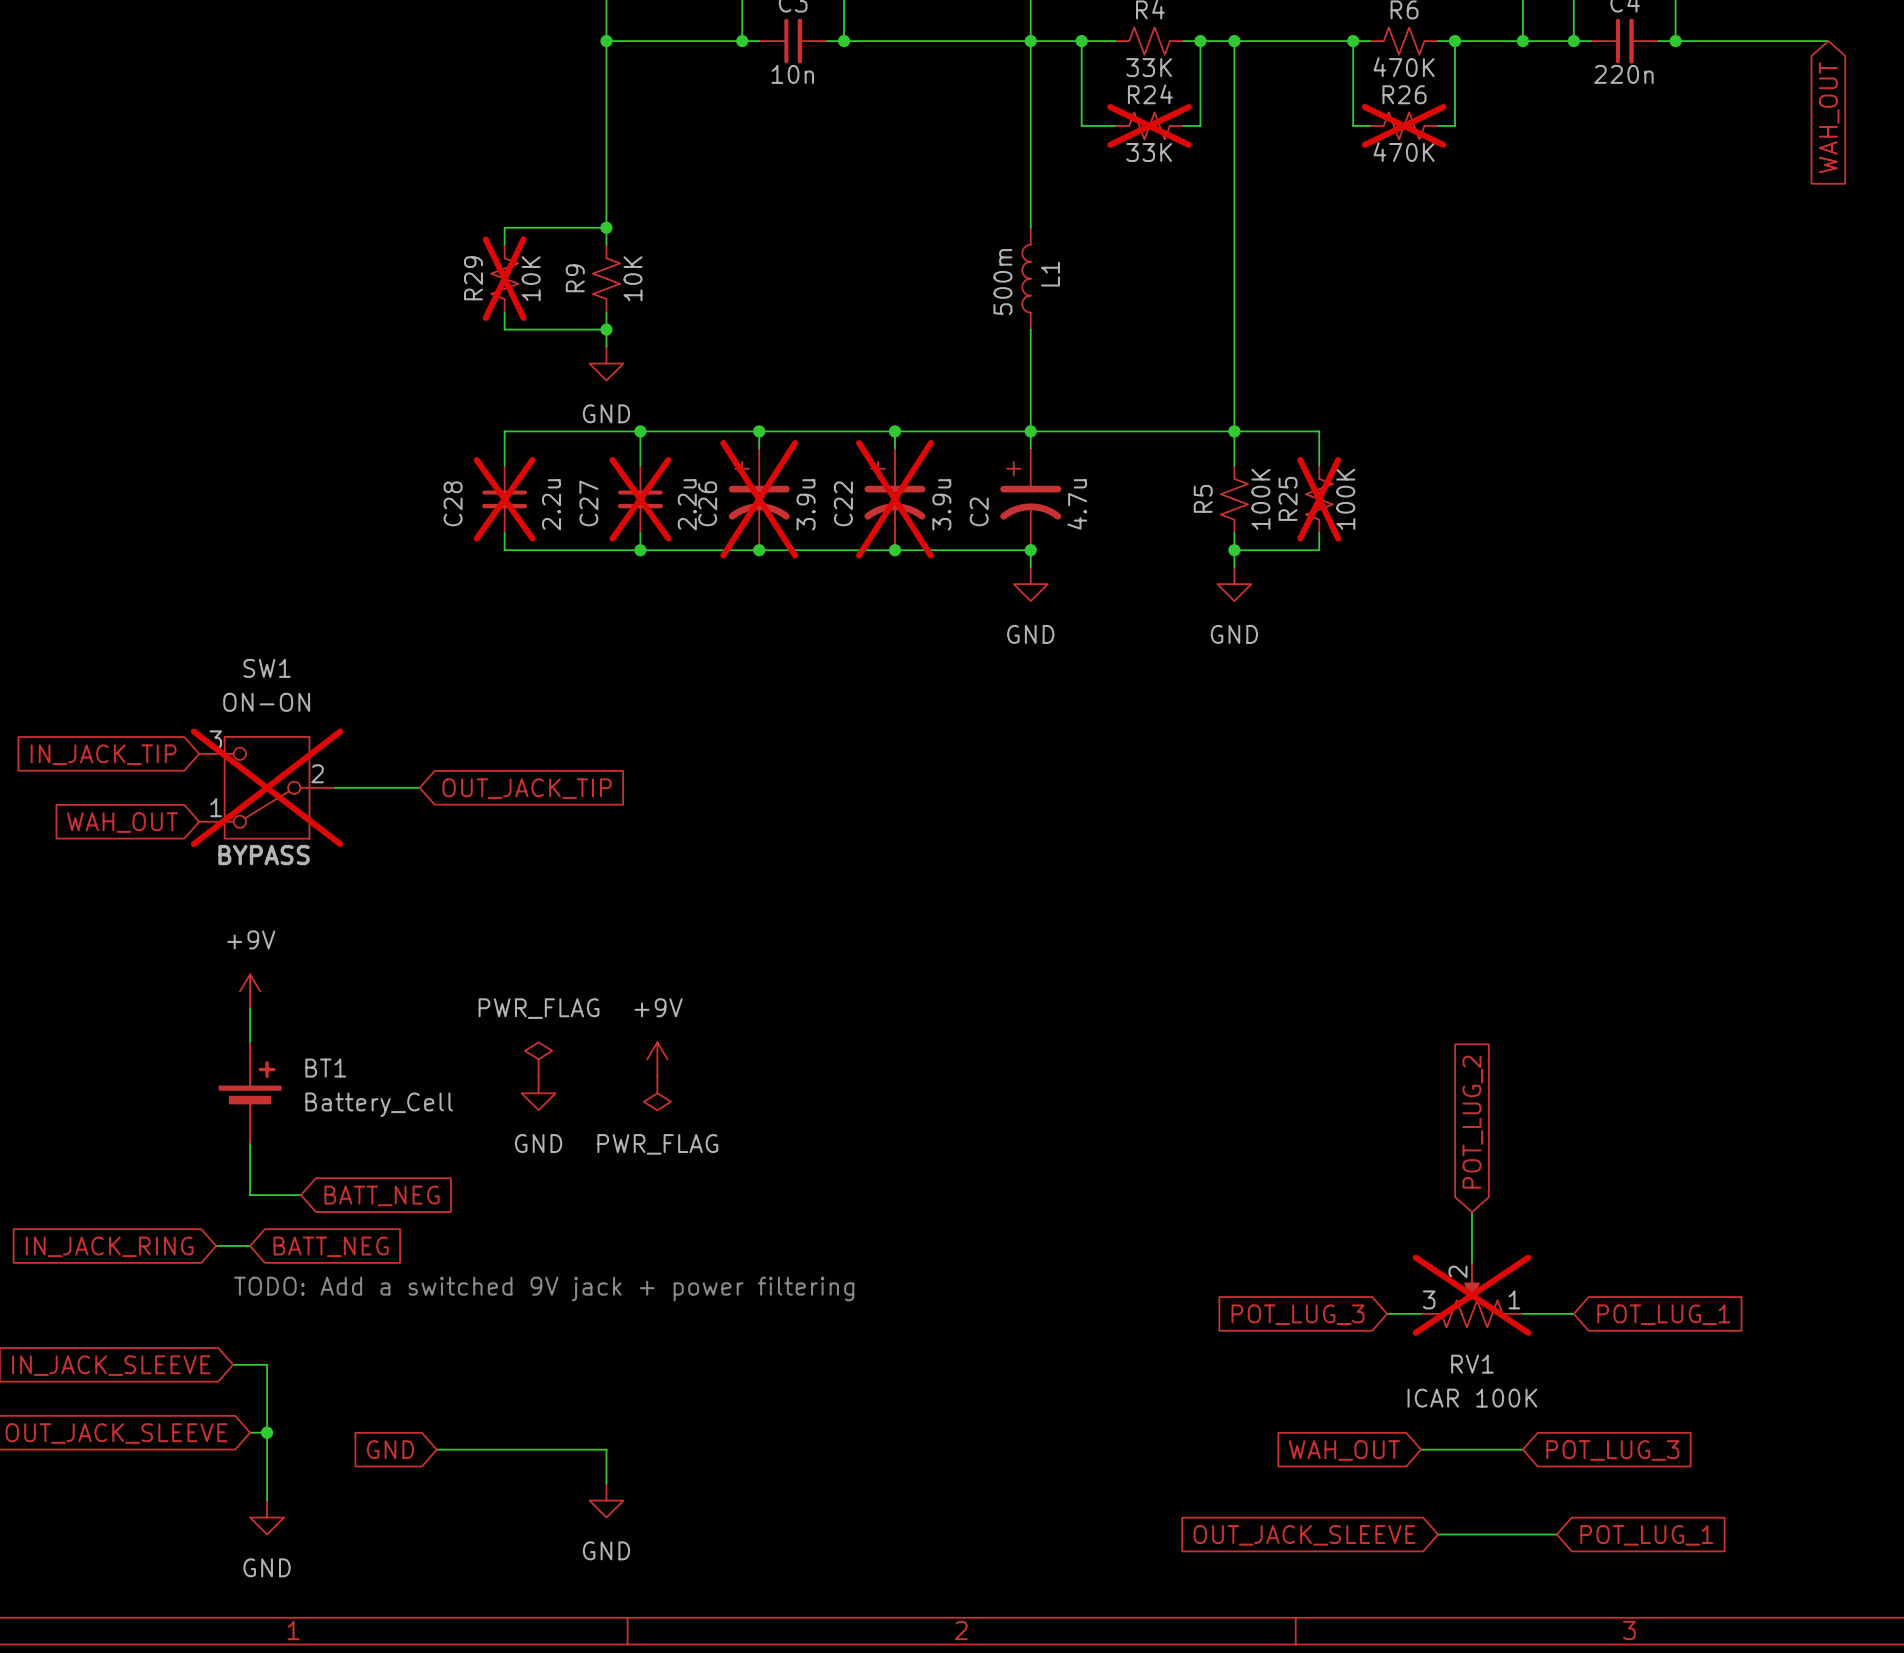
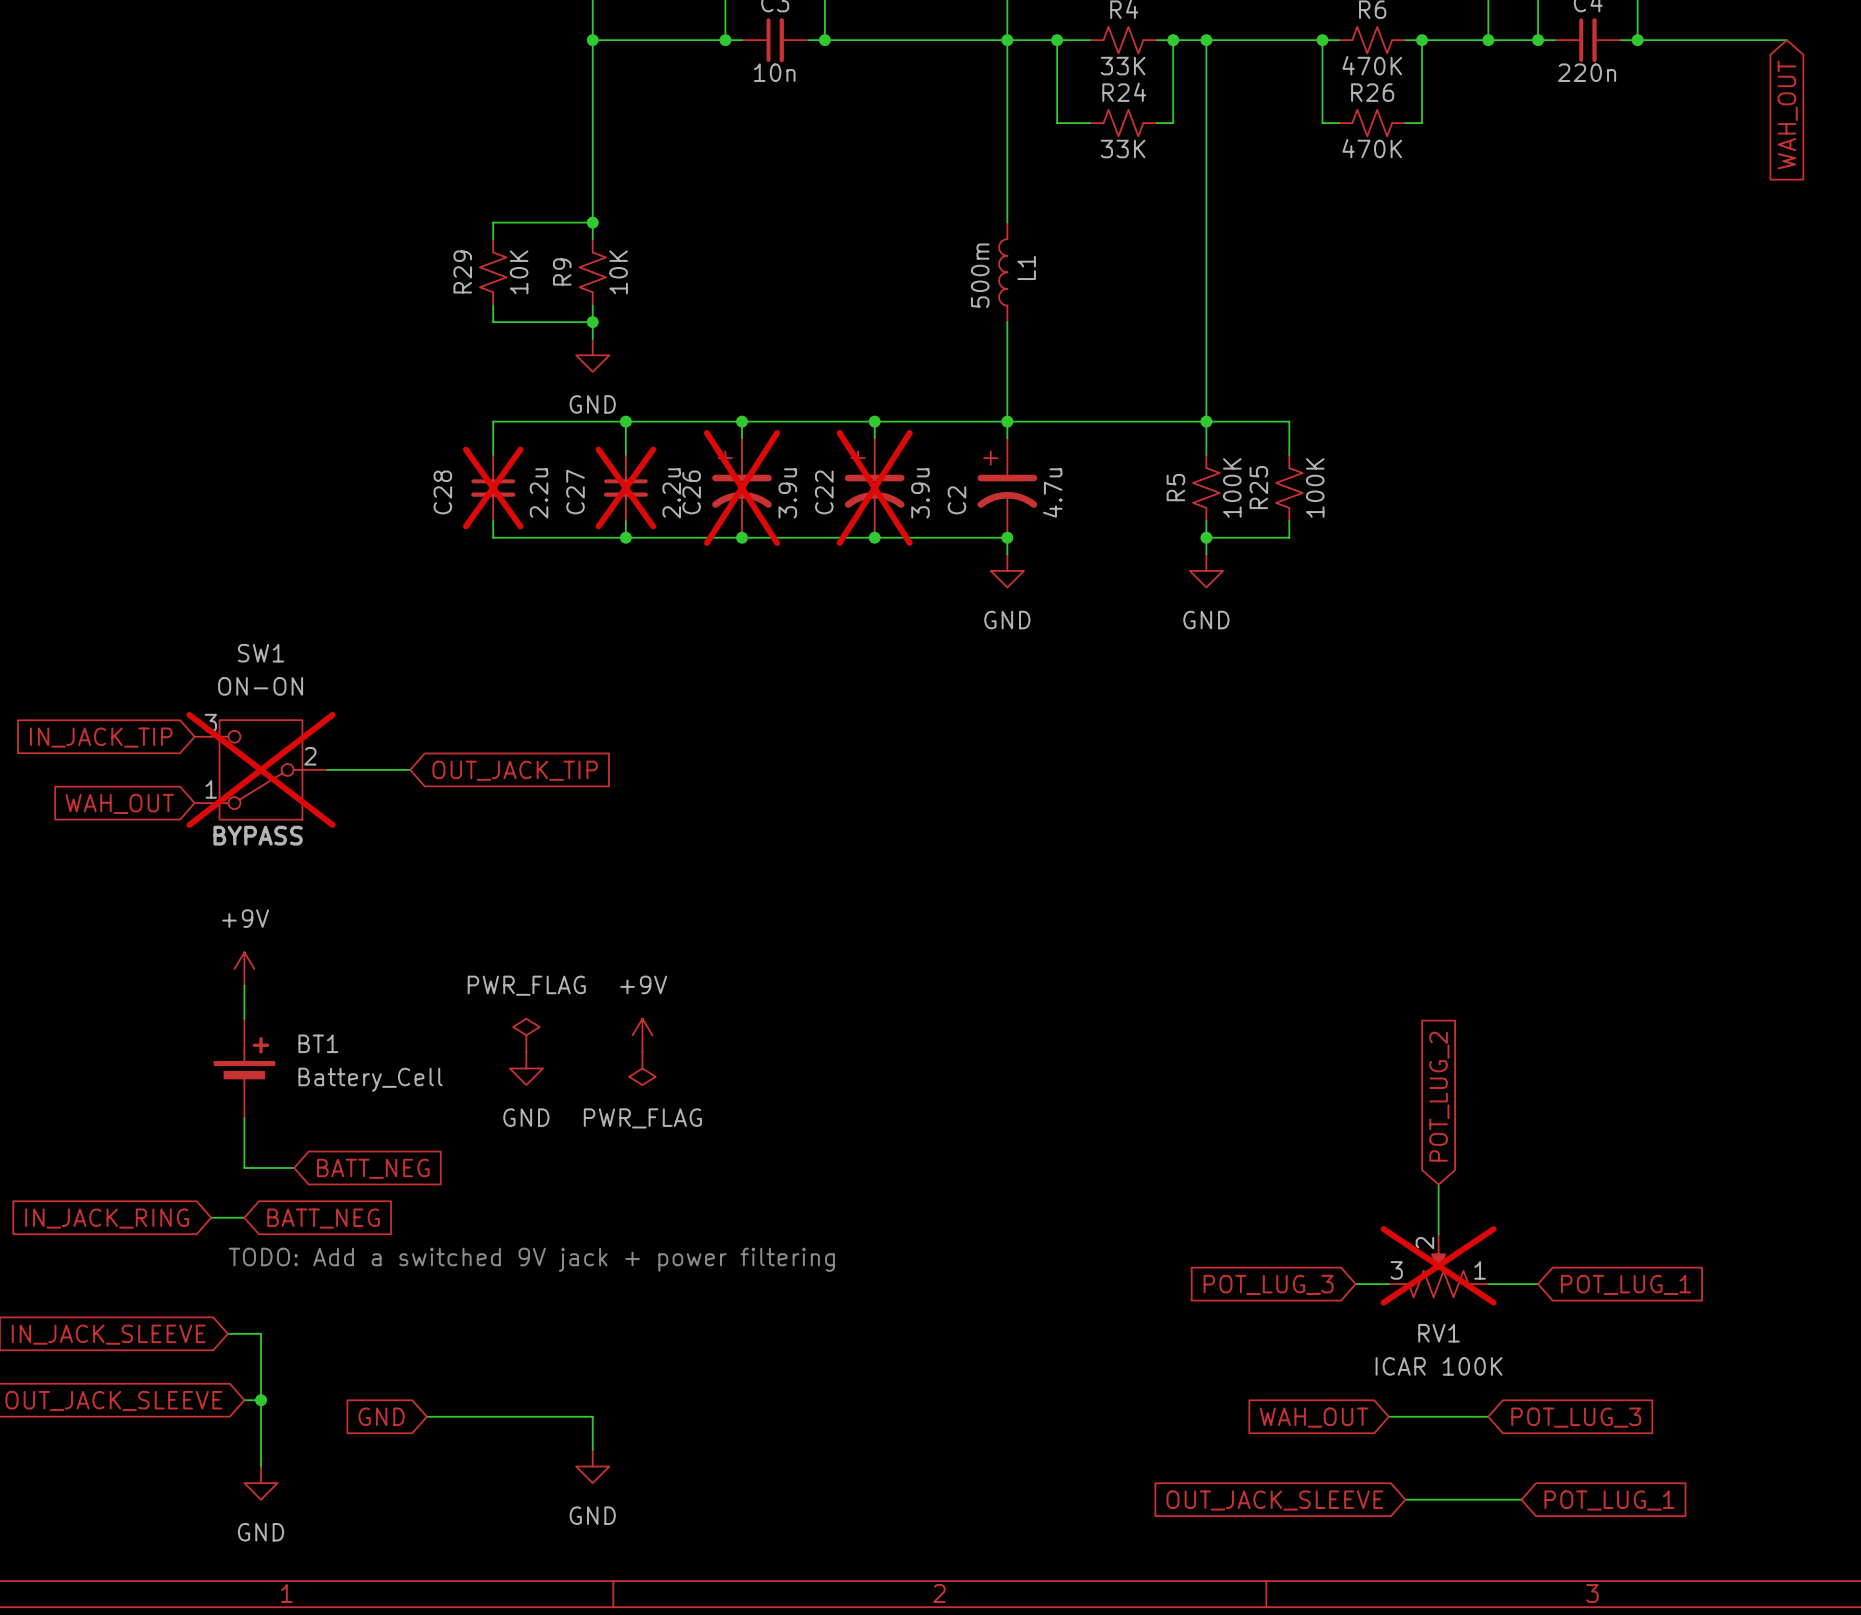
R24 do-not-place cross: (1149, 125) -> none
R26 do-not-place cross: (1404, 125) -> none
R29 do-not-place cross: (504, 278) -> none
R25 do-not-place cross: (1319, 499) -> none

